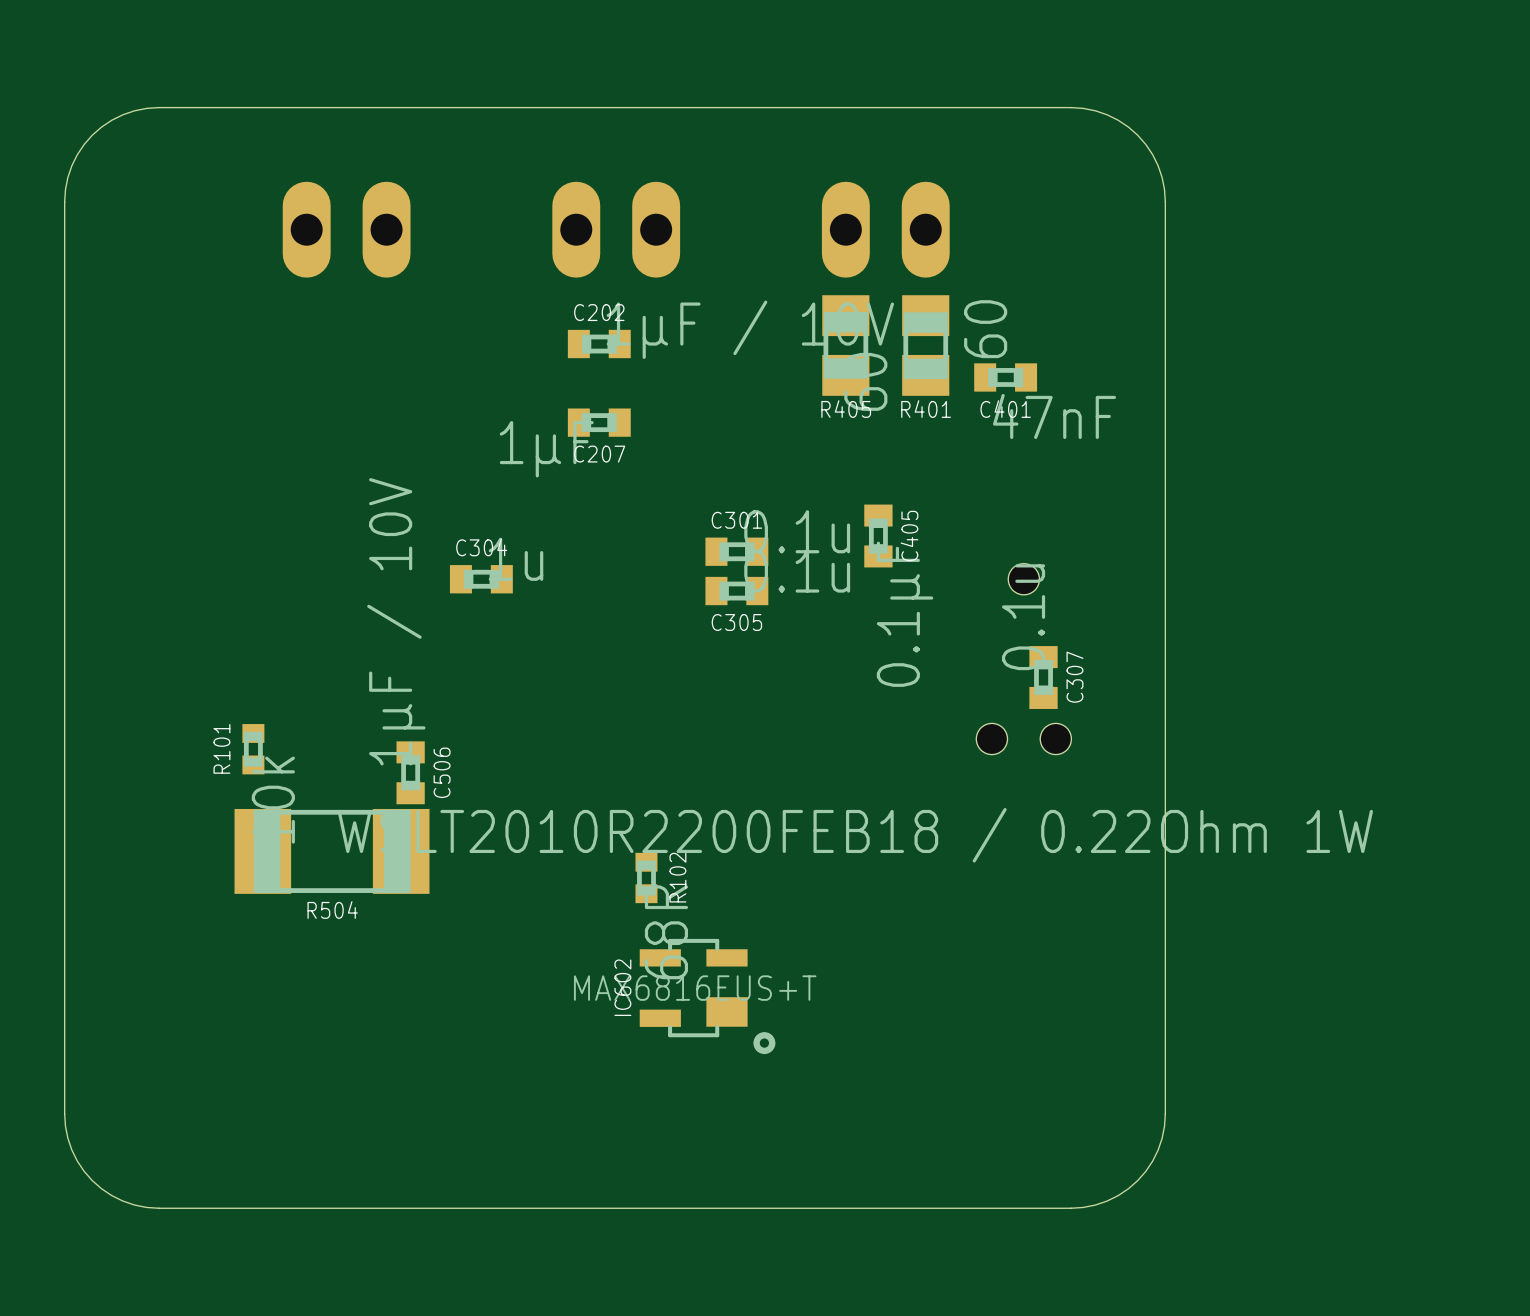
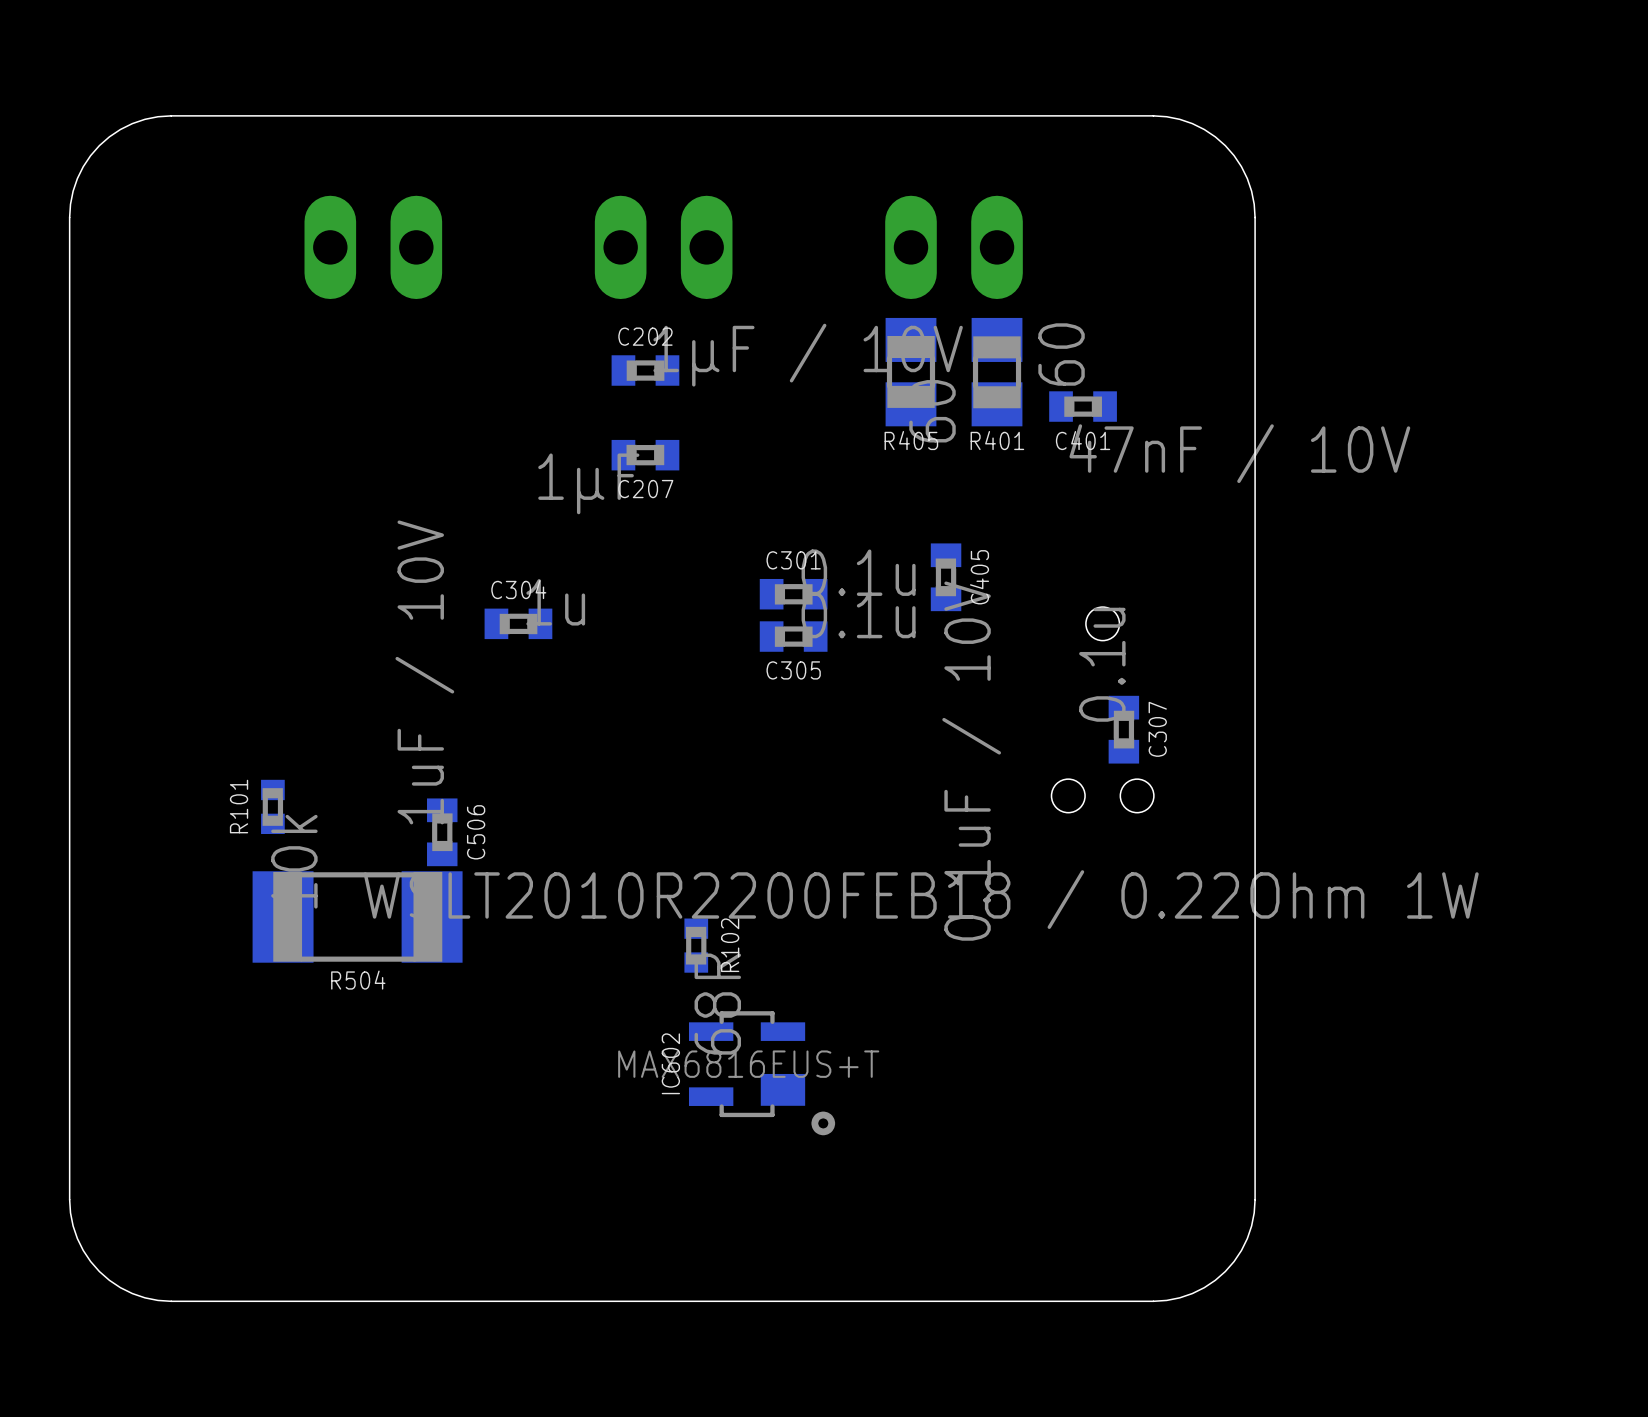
C401 value: 47nF (1054, 416) -> 47nF / 10V (1239, 453)
C405 value: 0.1μF (905, 614) -> 0.1uF / 10V (971, 761)
C506 value: 1μF / 10V (396, 621) -> 1uF / 10V (424, 672)

